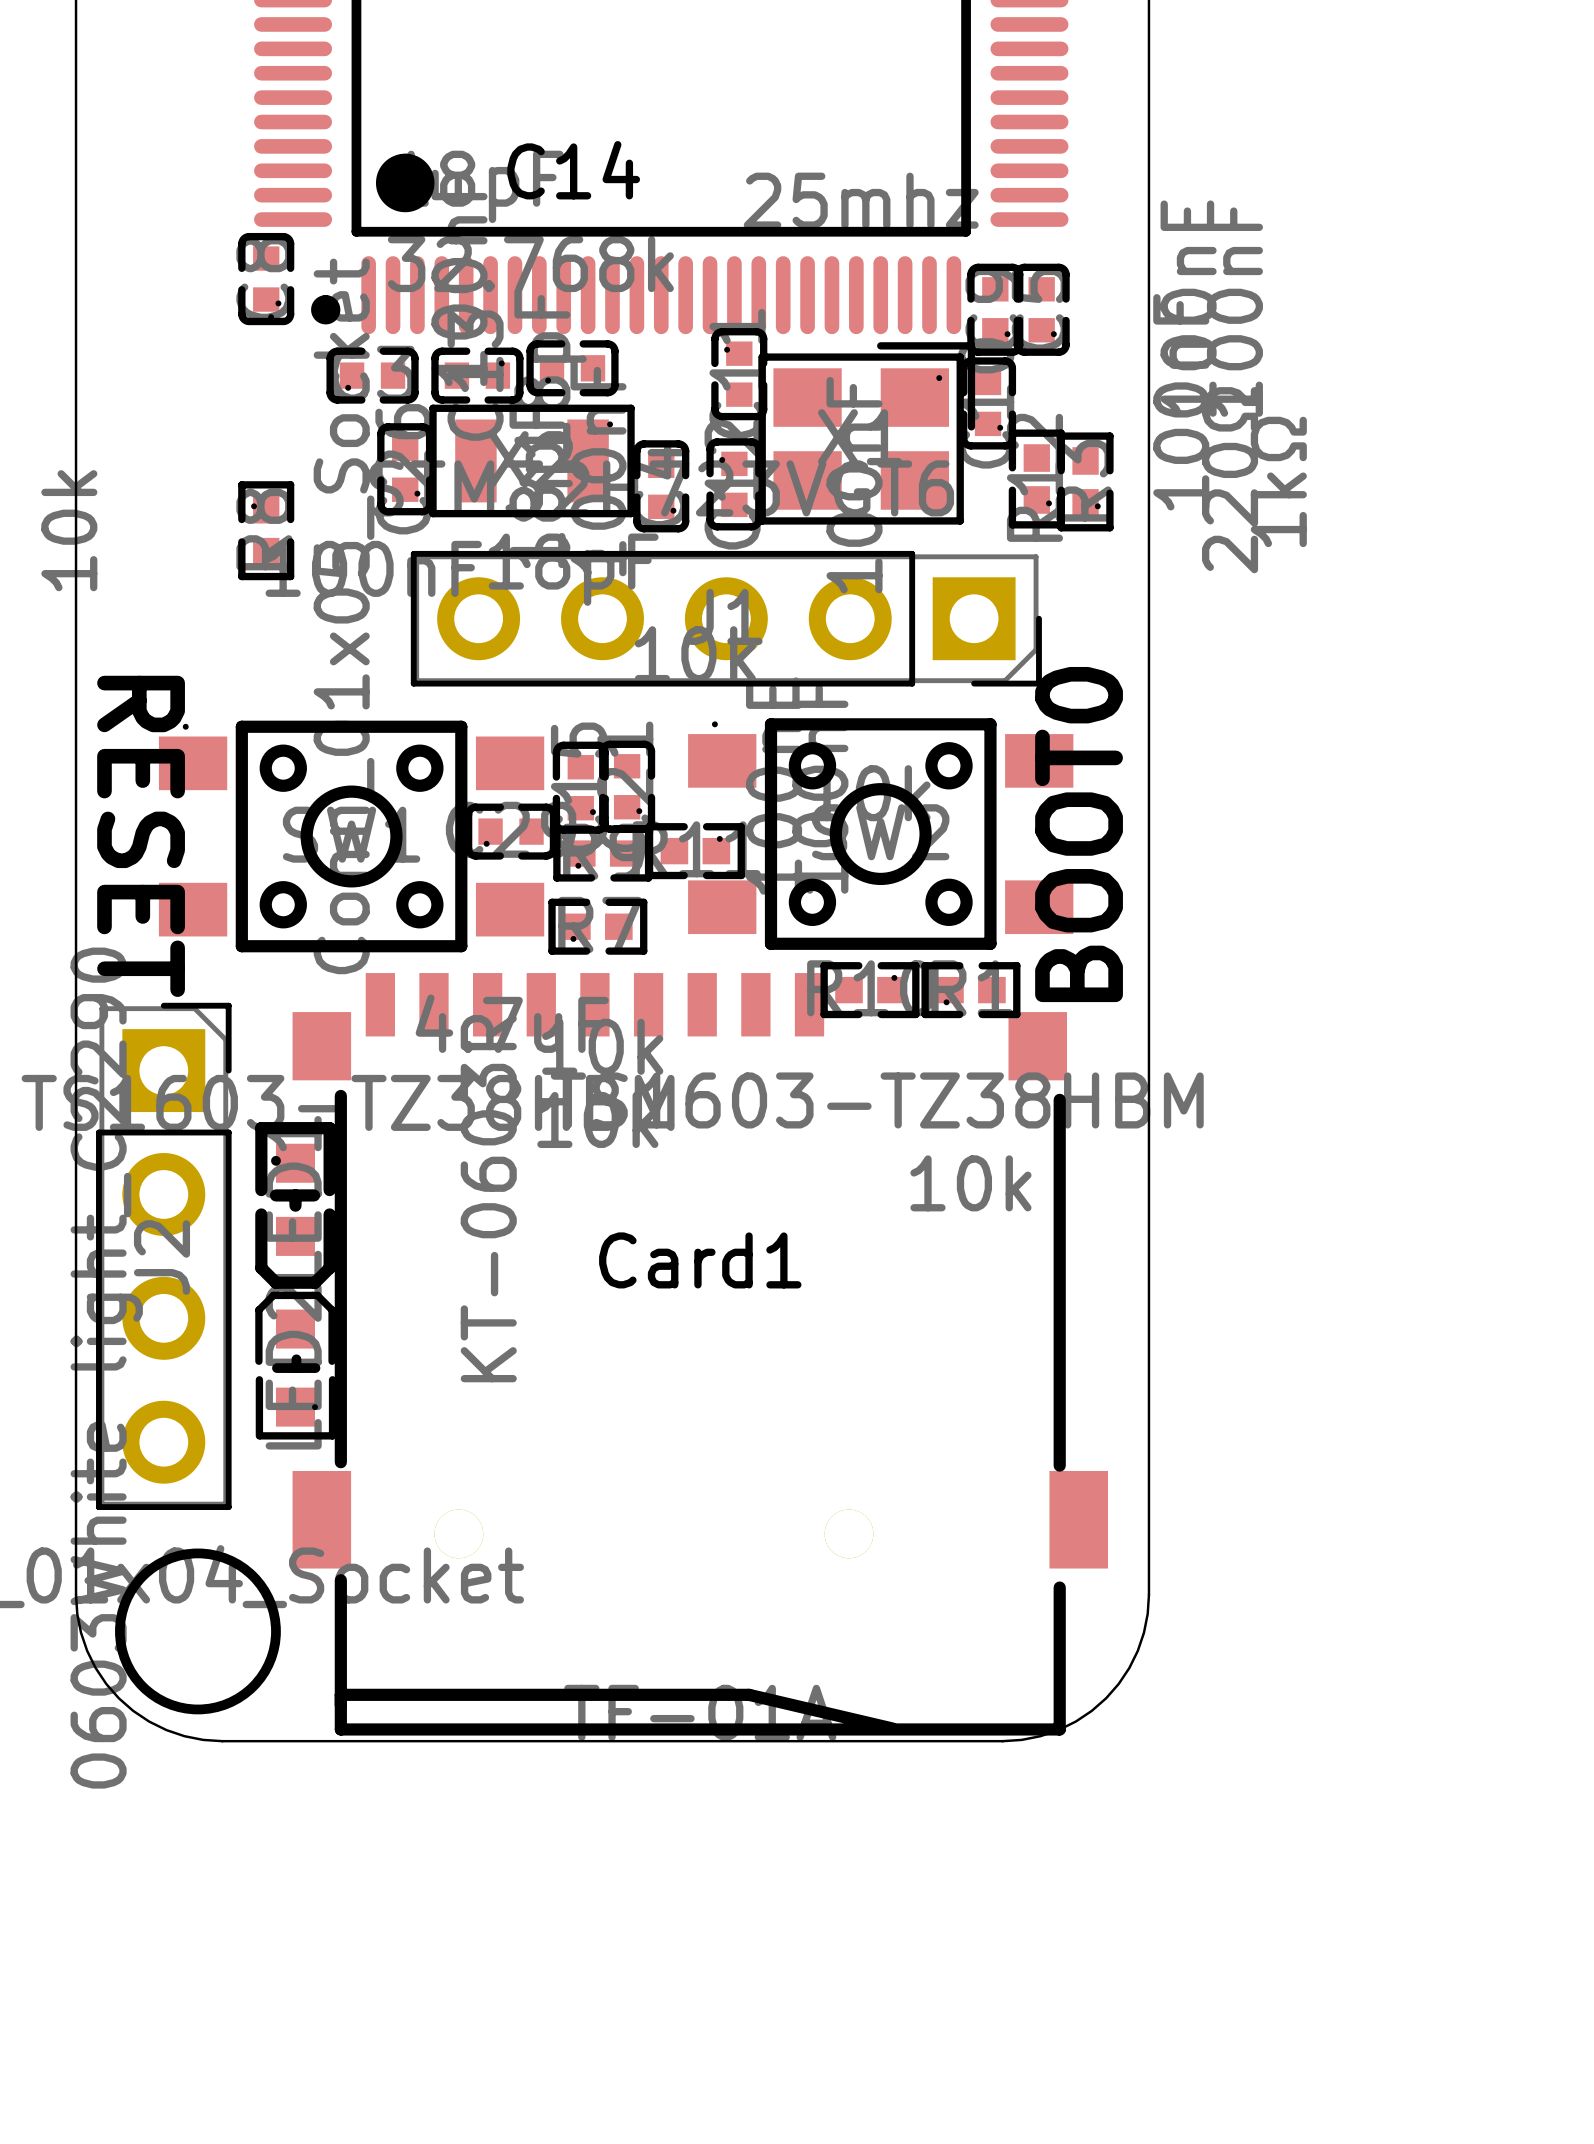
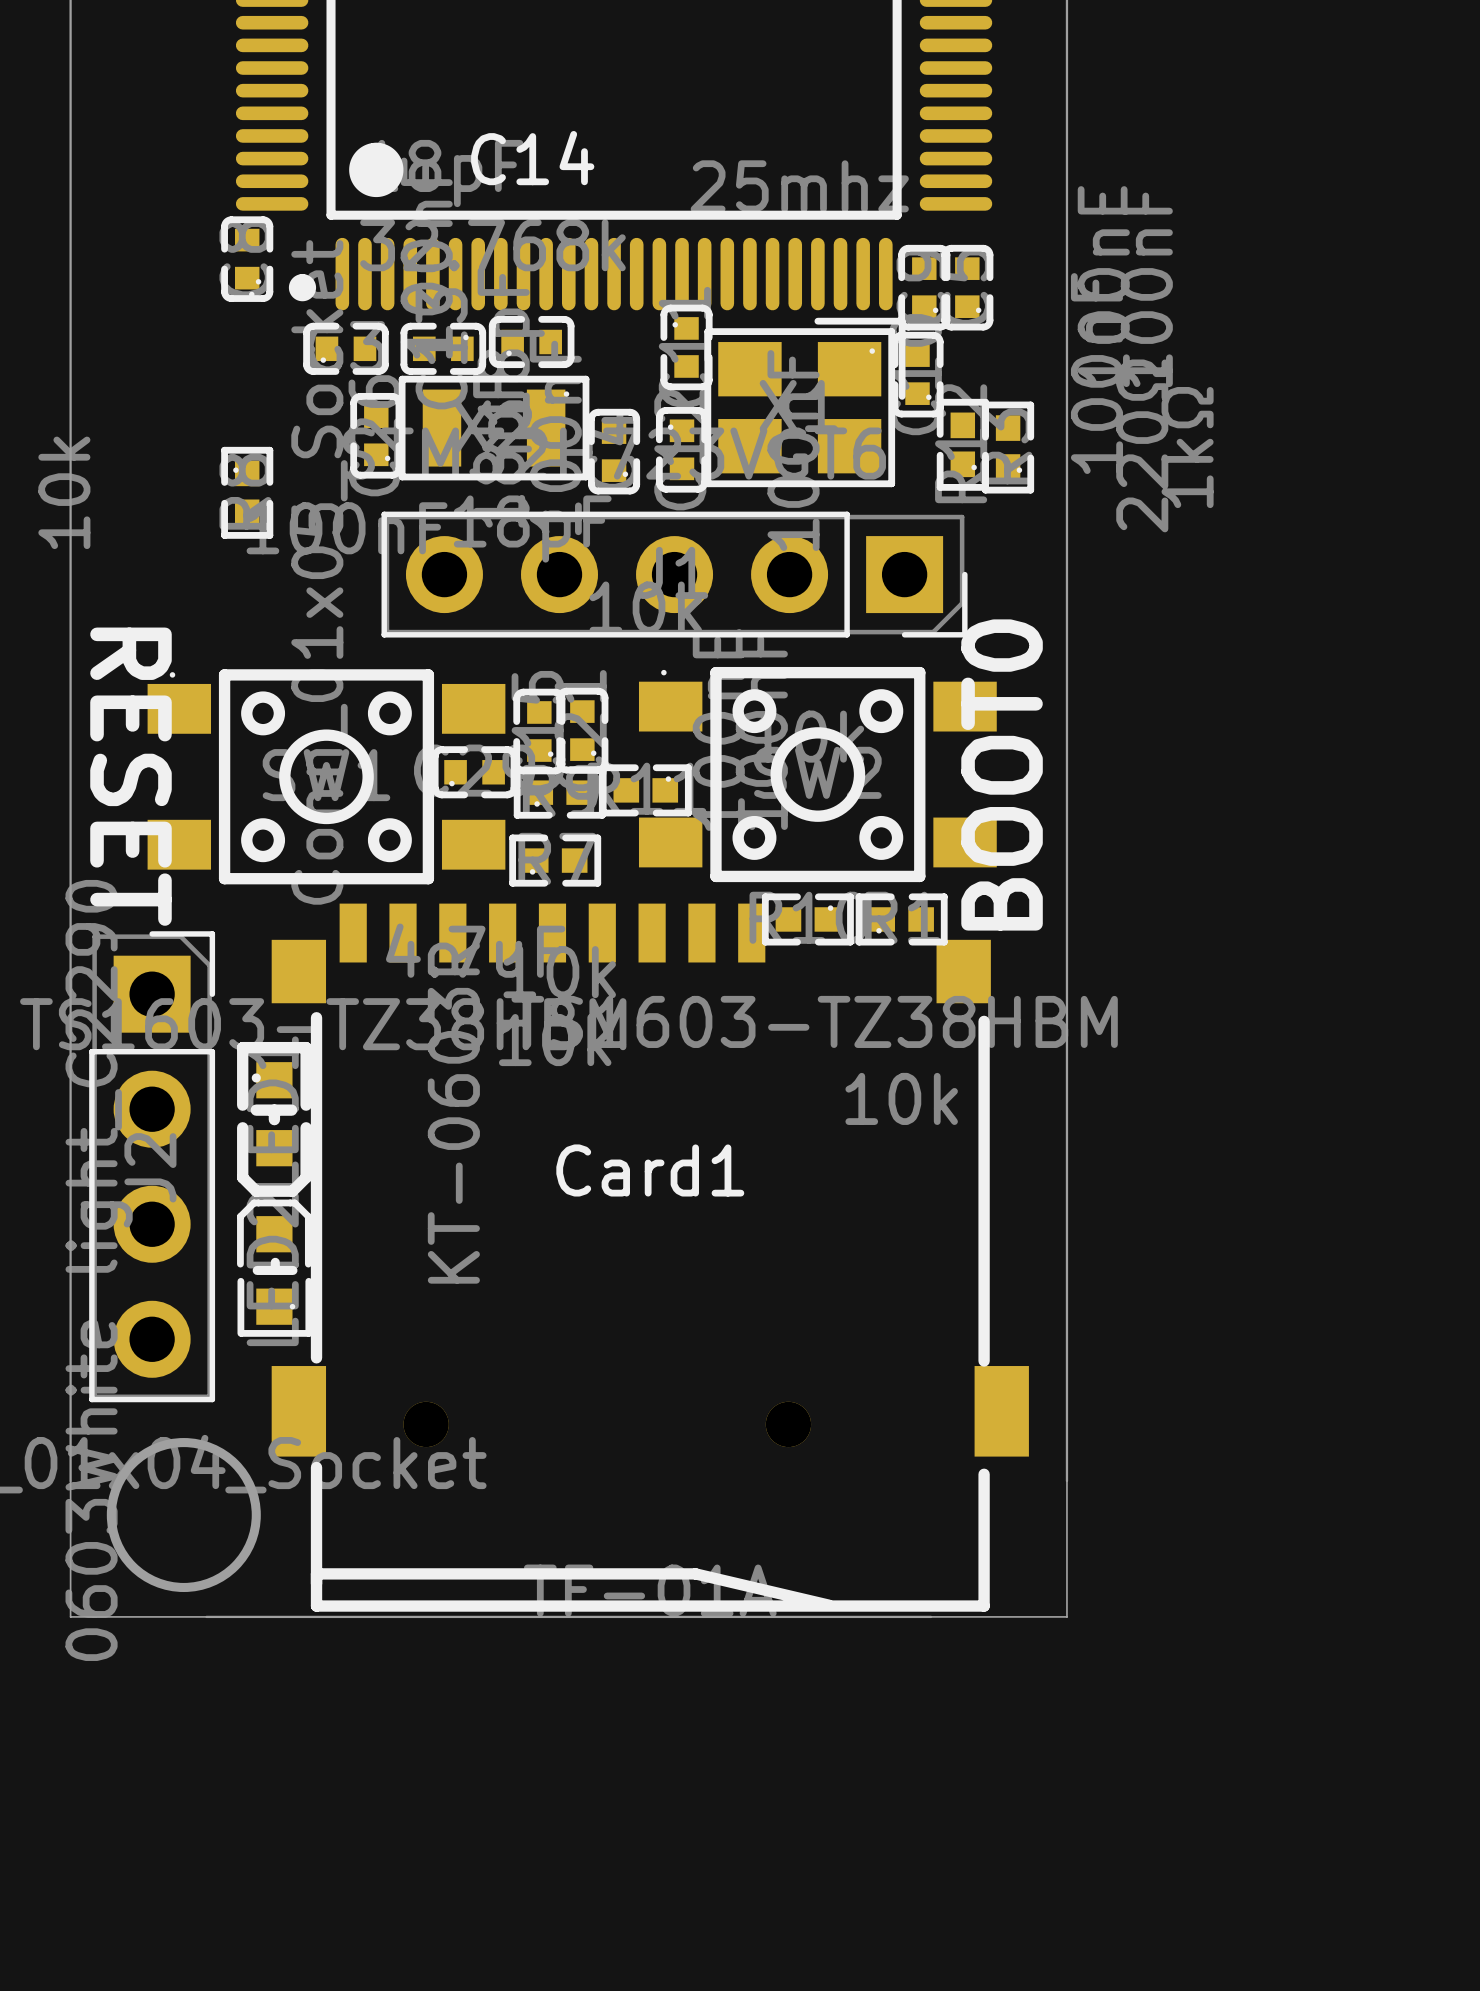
board edge: (76, 1594) (77, 1613) (87, 1650) (106, 1683) (118, 1698) (133, 1710) (166, 1730) (203, 1739) (222, 1741) -> (70, 1481) (70, 1616) (206, 1616)
board edge: (1148, 1594) (1143, 1632) (1137, 1650) (1118, 1683) (1106, 1698) (1075, 1721) (1058, 1730) (1021, 1739) (1002, 1741) -> (1066, 1481) (1066, 1616) (931, 1616)

